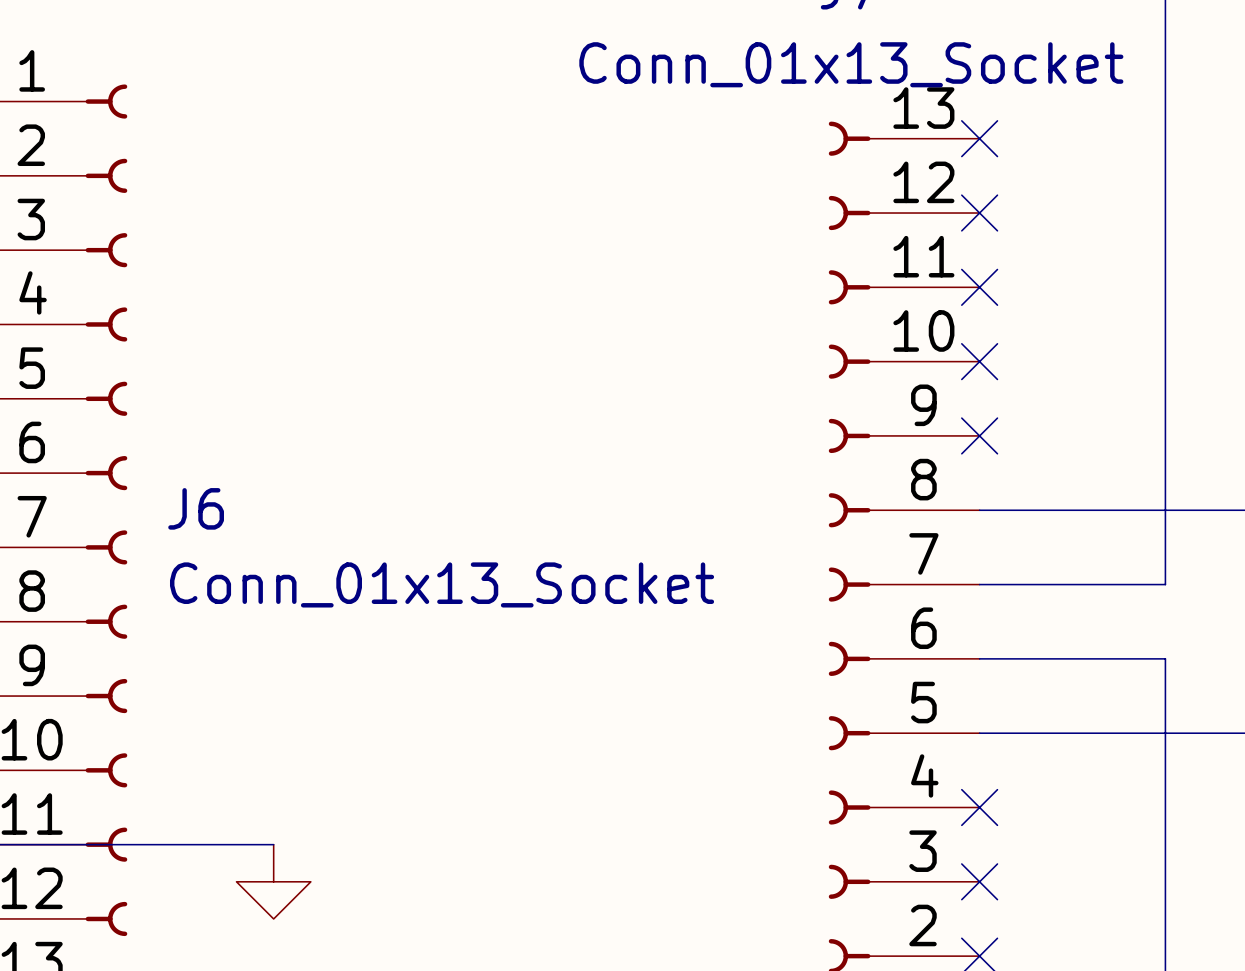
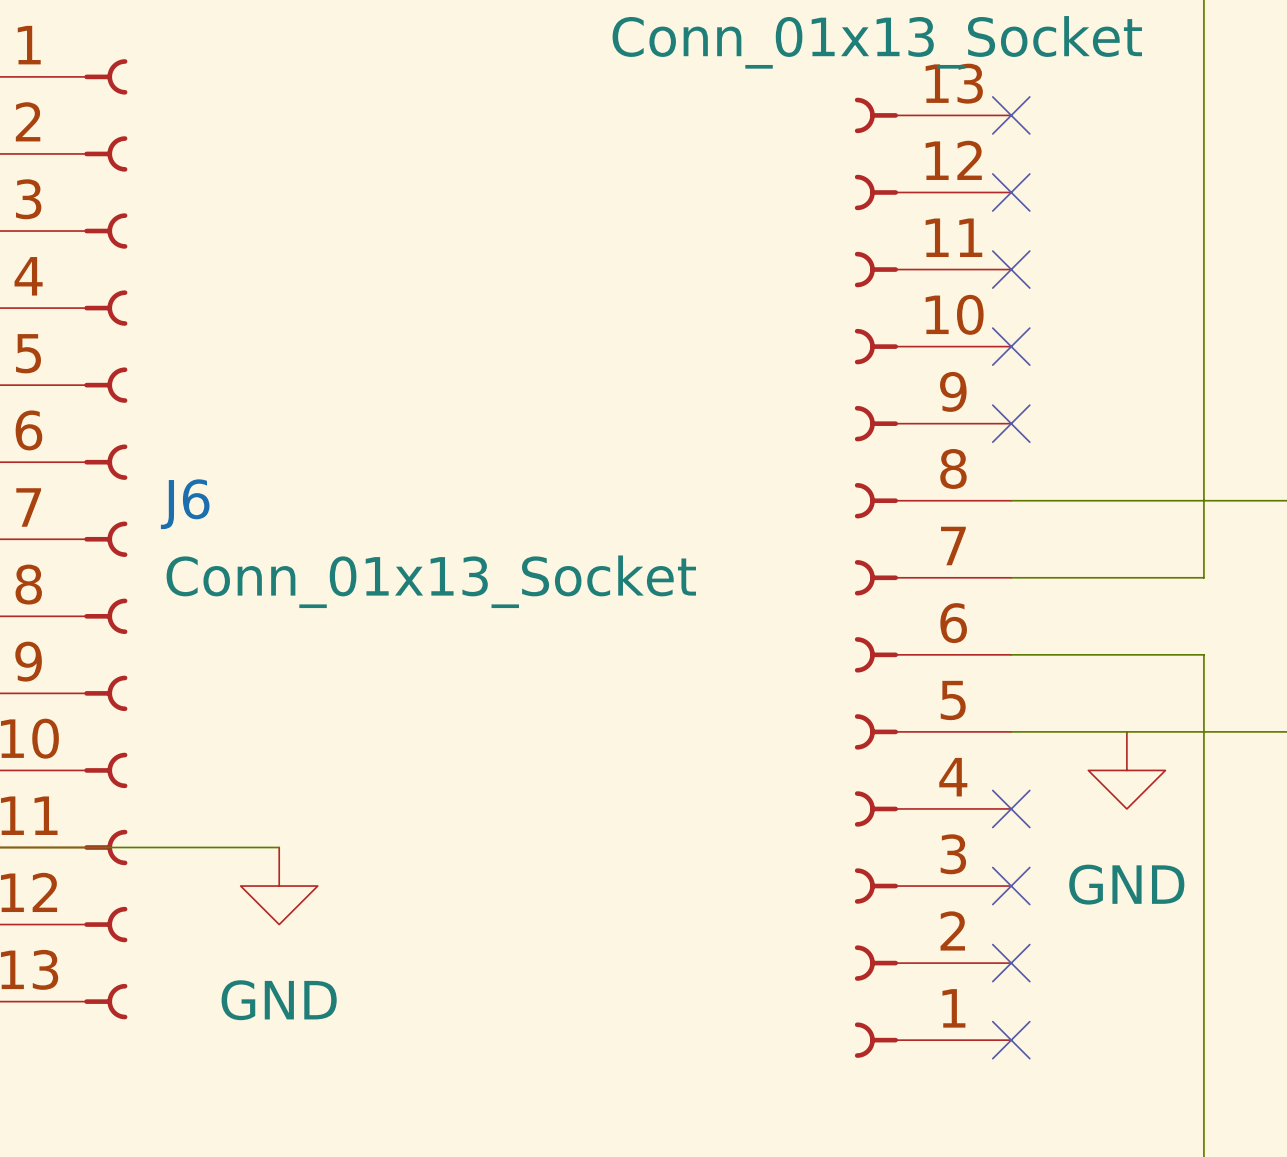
power symbol: none -> GND (1126, 770)

